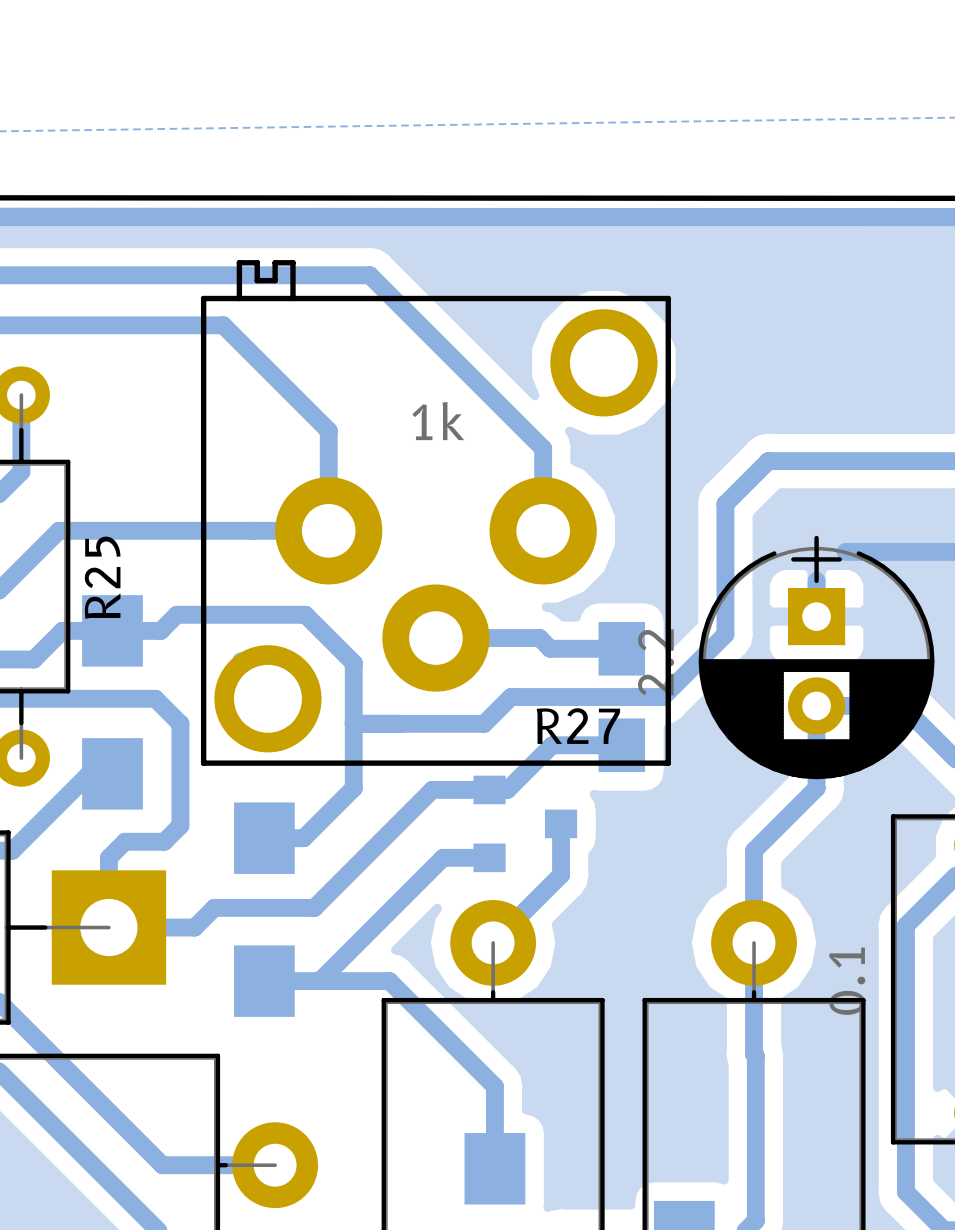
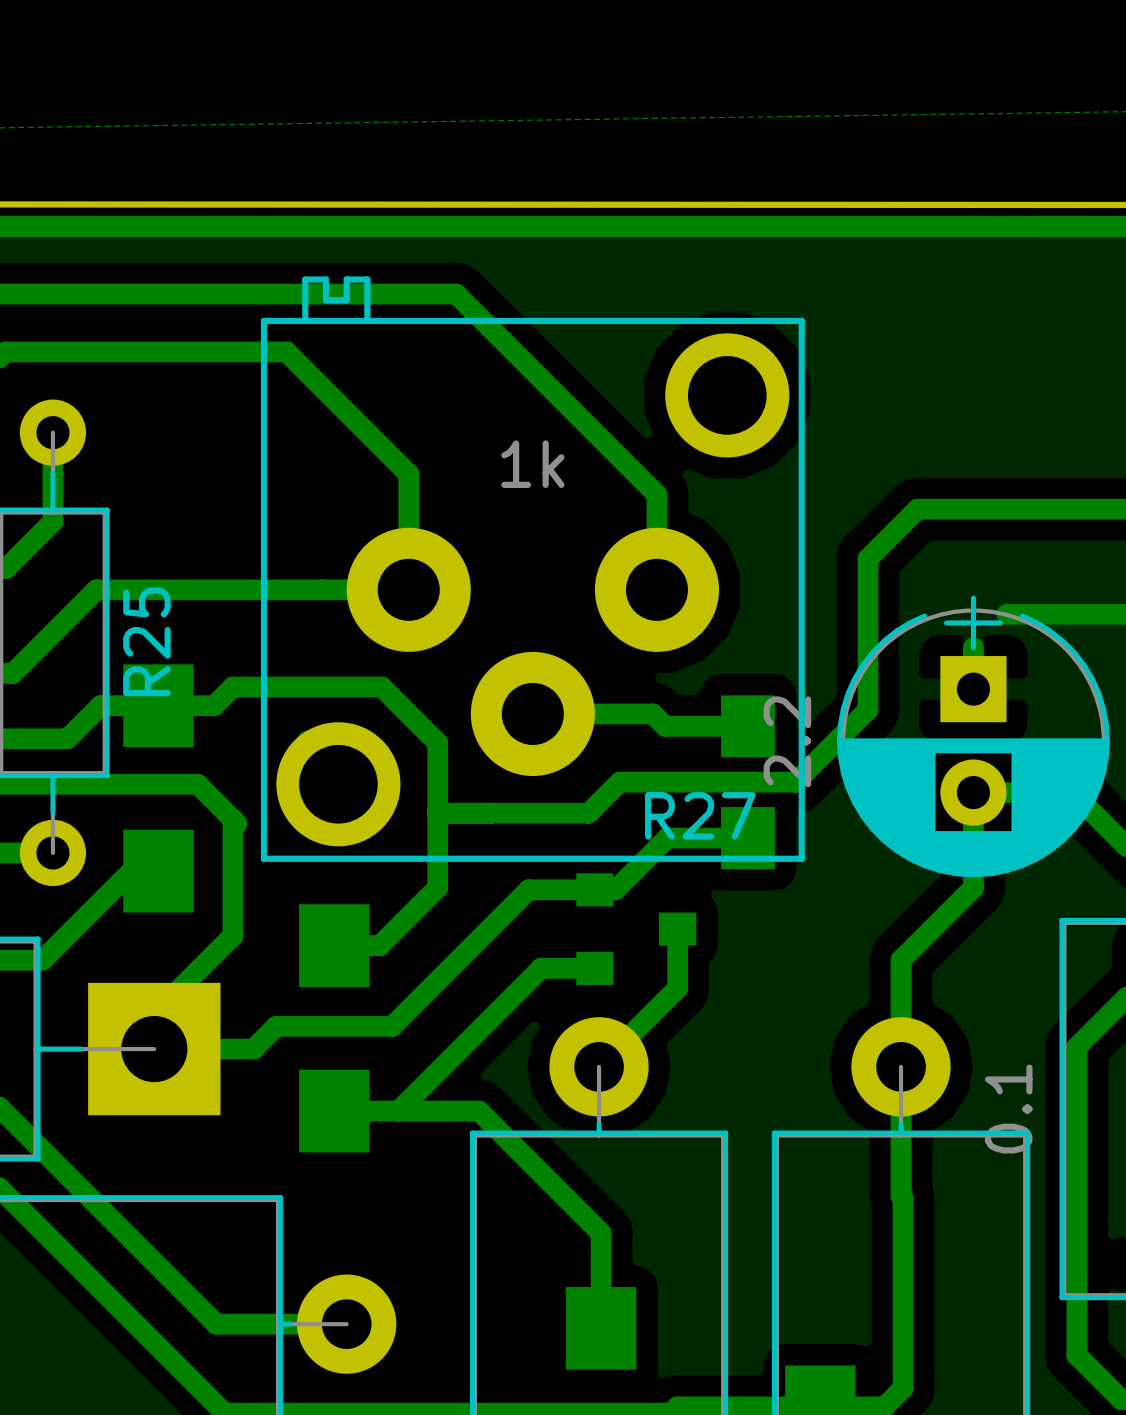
bottom track: (146, 698) (155, 698) (180, 723) (180, 825) (164, 841) (125, 841) (108, 857) (108, 897) -> (232, 819) (232, 935) (154, 1014)
bottom track: none -> (197, 784) (237, 823)

